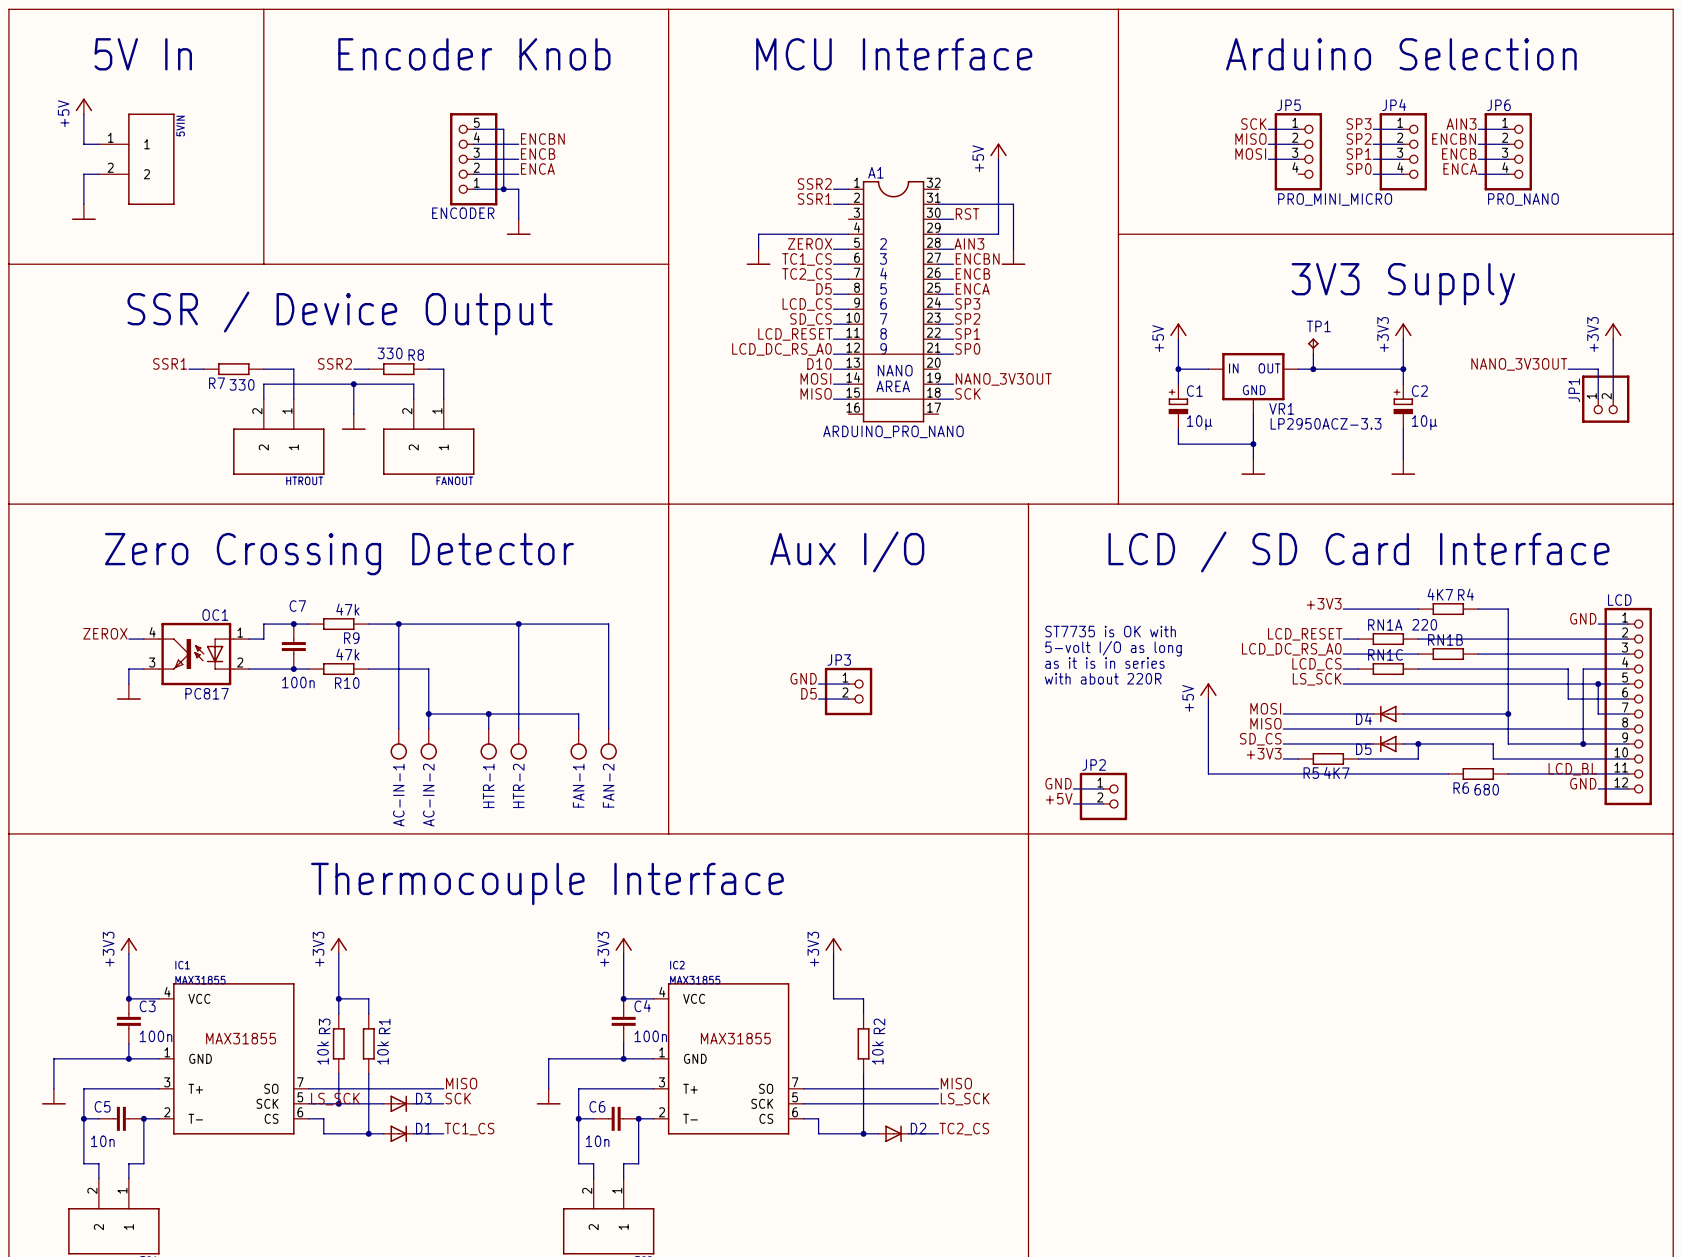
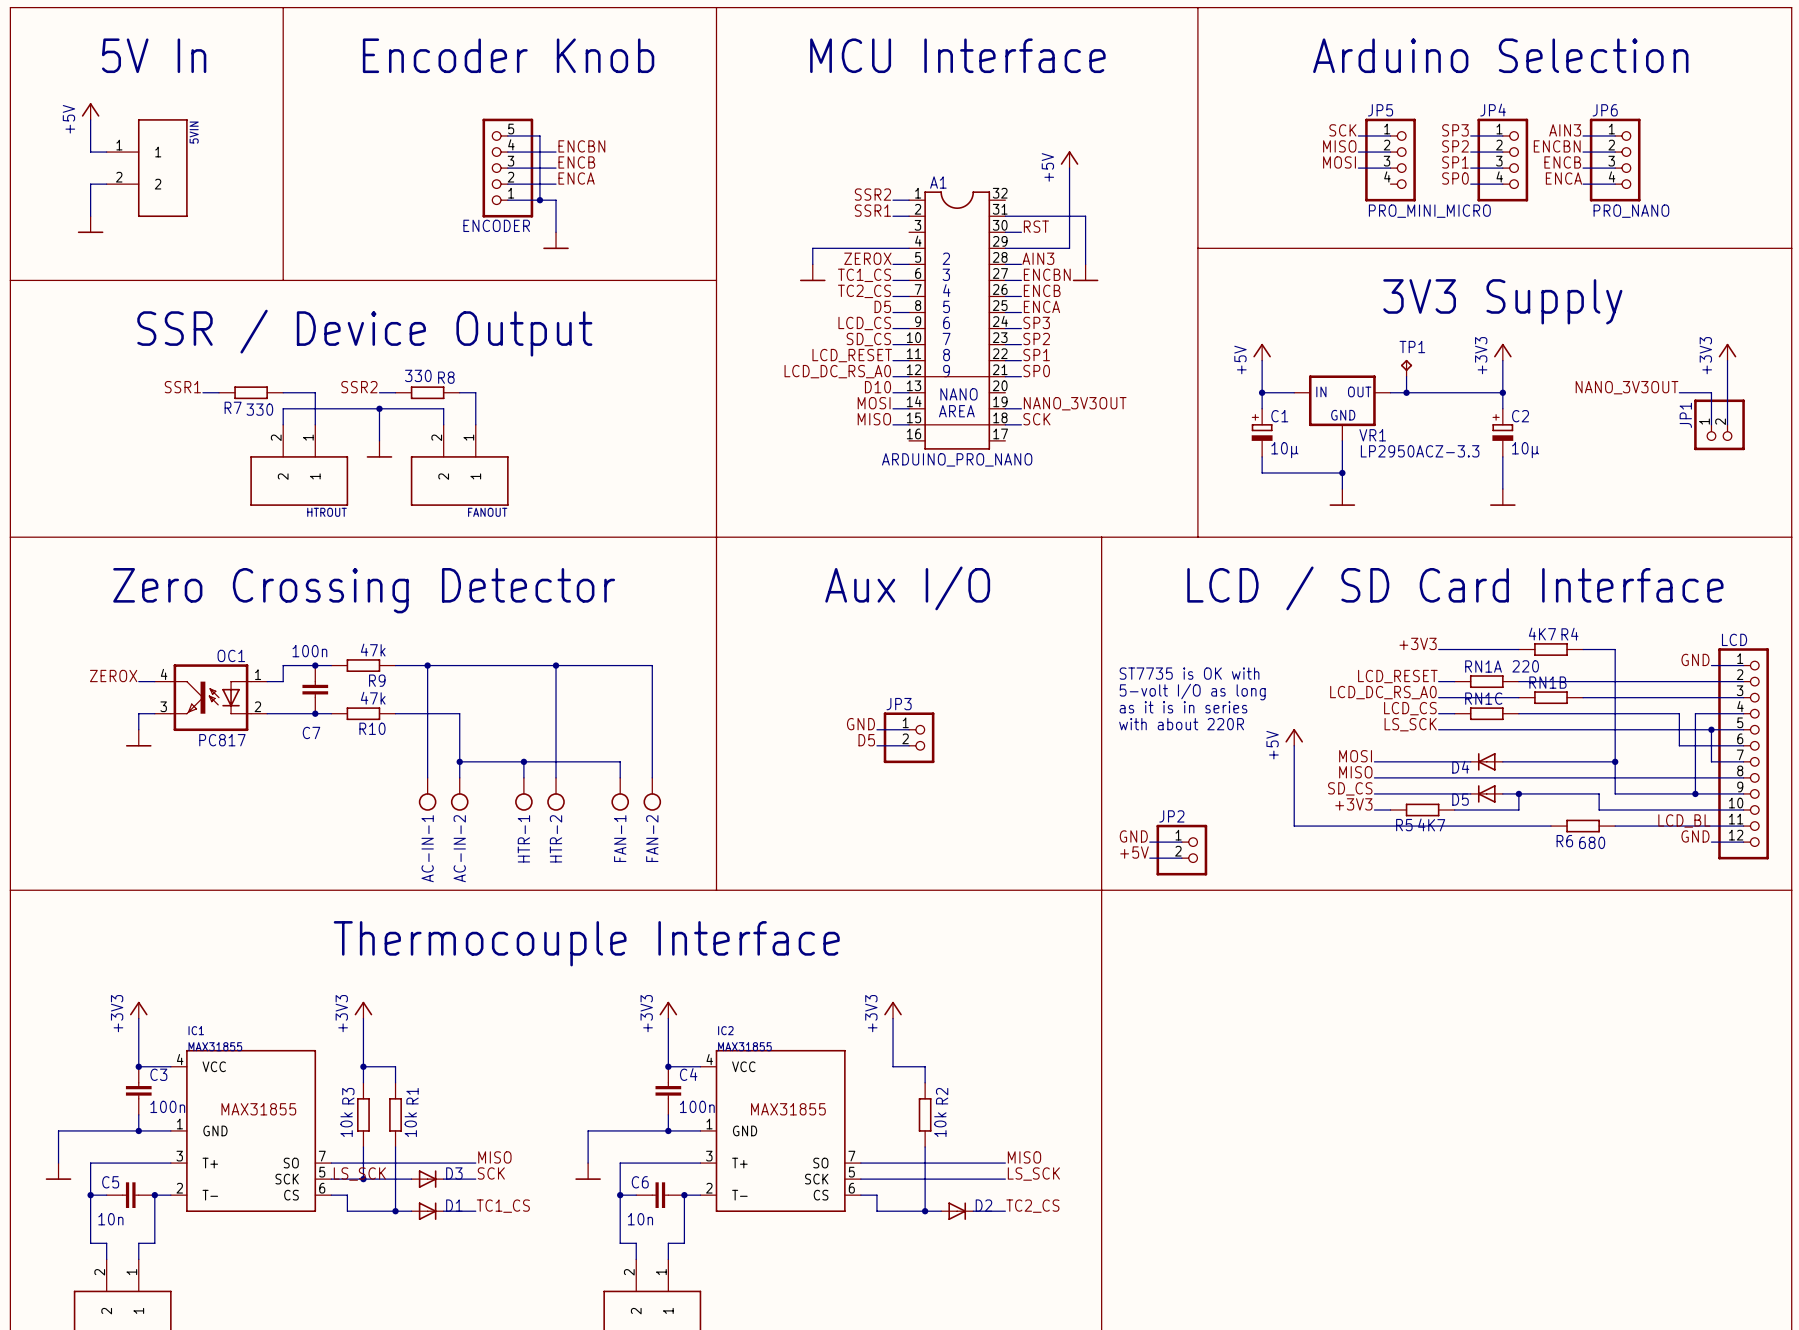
C7 name position: C7 (297, 606) -> C7 (311, 732)
C7 value position: 100n (298, 682) -> 100n (309, 651)

